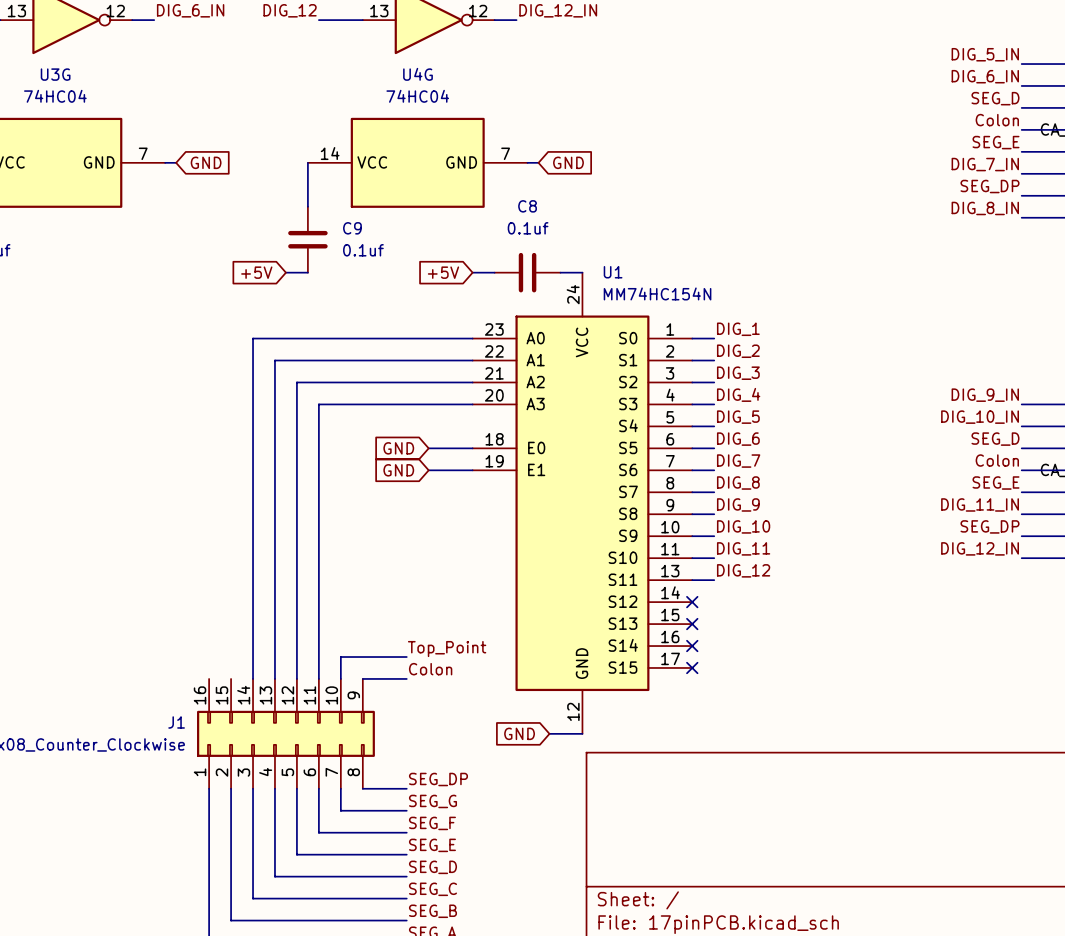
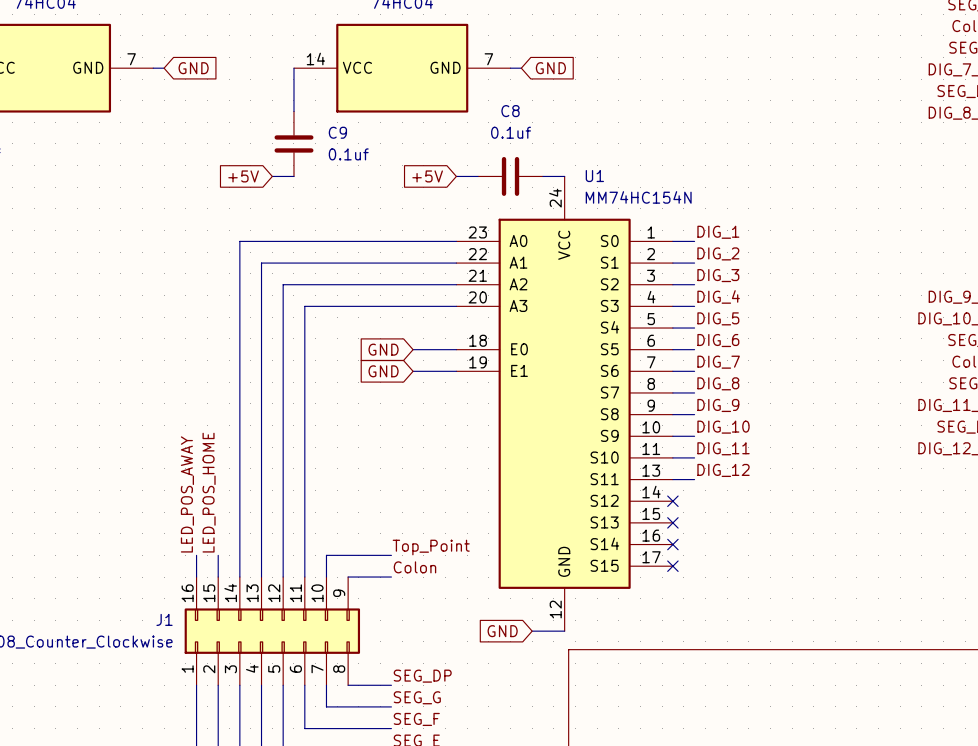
label: none -> LED_POS_HOME (209, 492)
label: none -> LED_POS_AWAY (187, 494)
wire: none -> (196, 555) (196, 577)
wire: none -> (218, 555) (218, 577)

